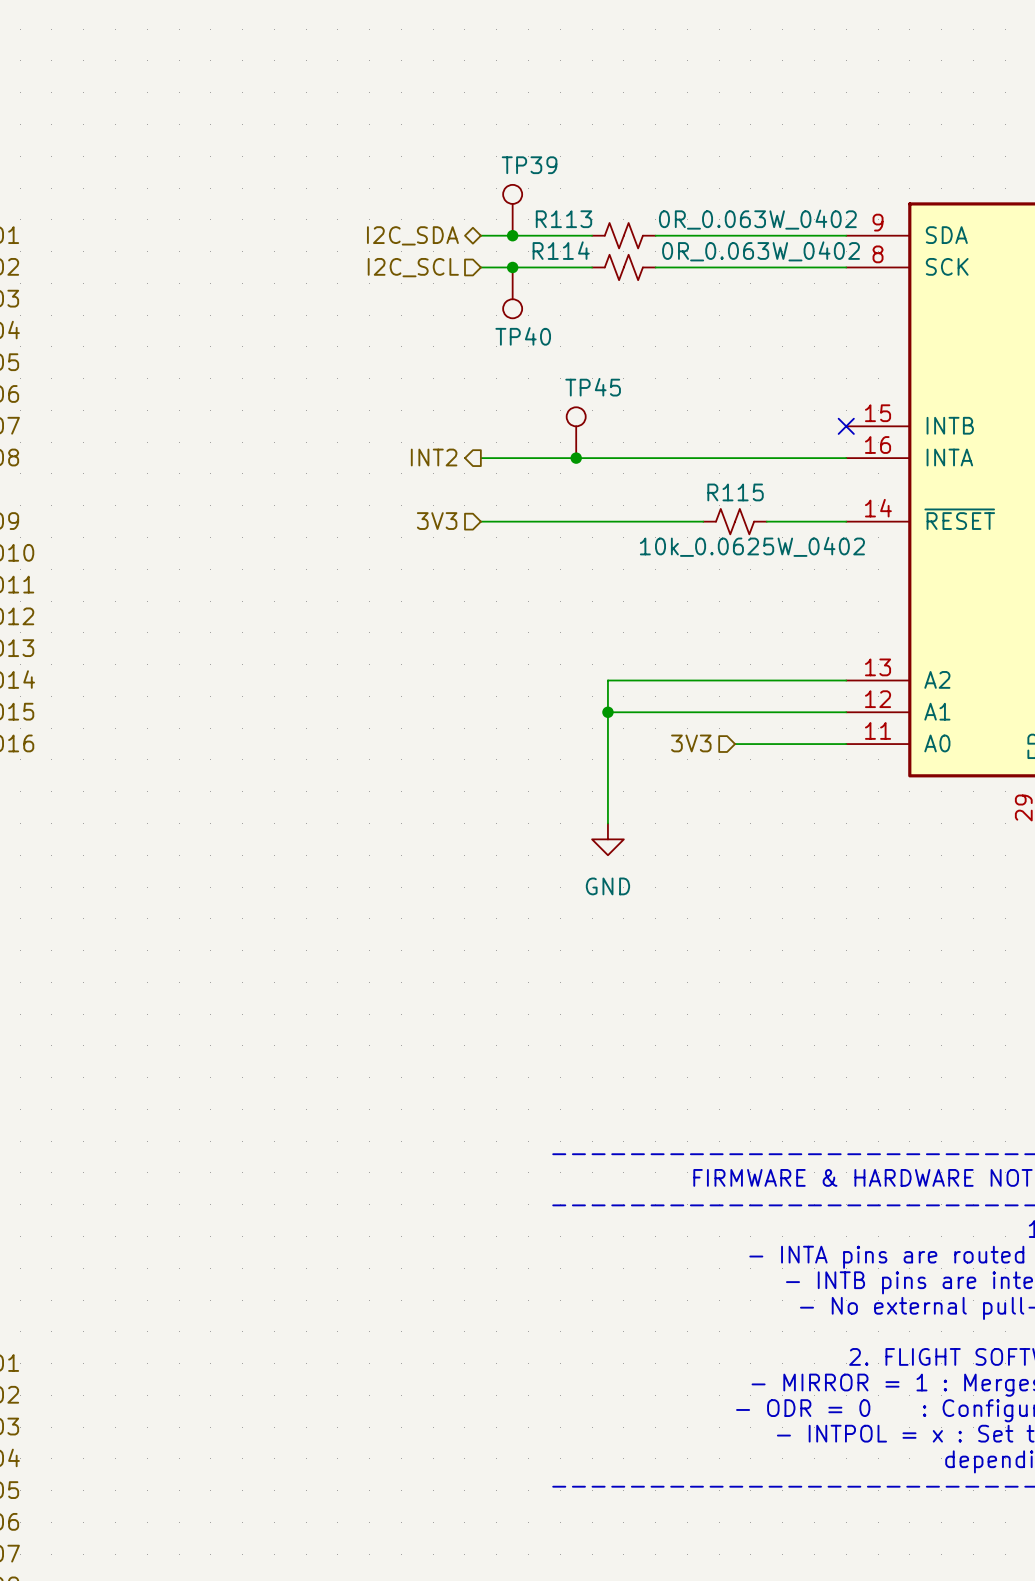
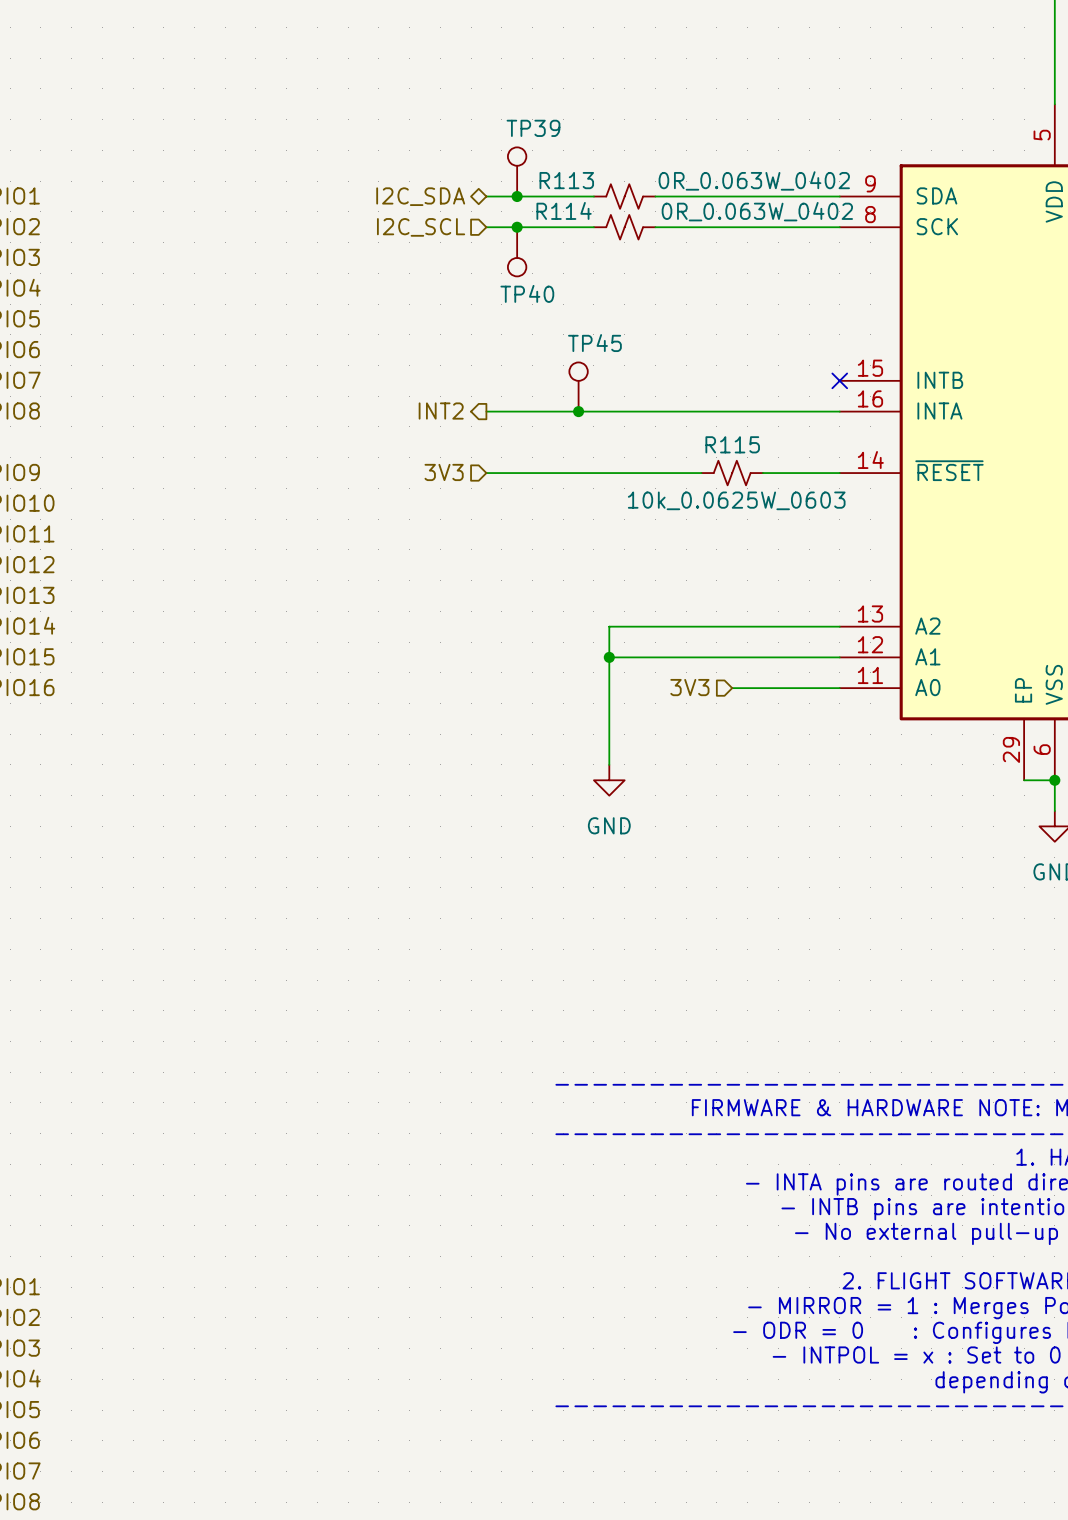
R115 value: 10k_0.0625W_0402 (752, 546) -> 10k_0.0625W_0603 (736, 500)

